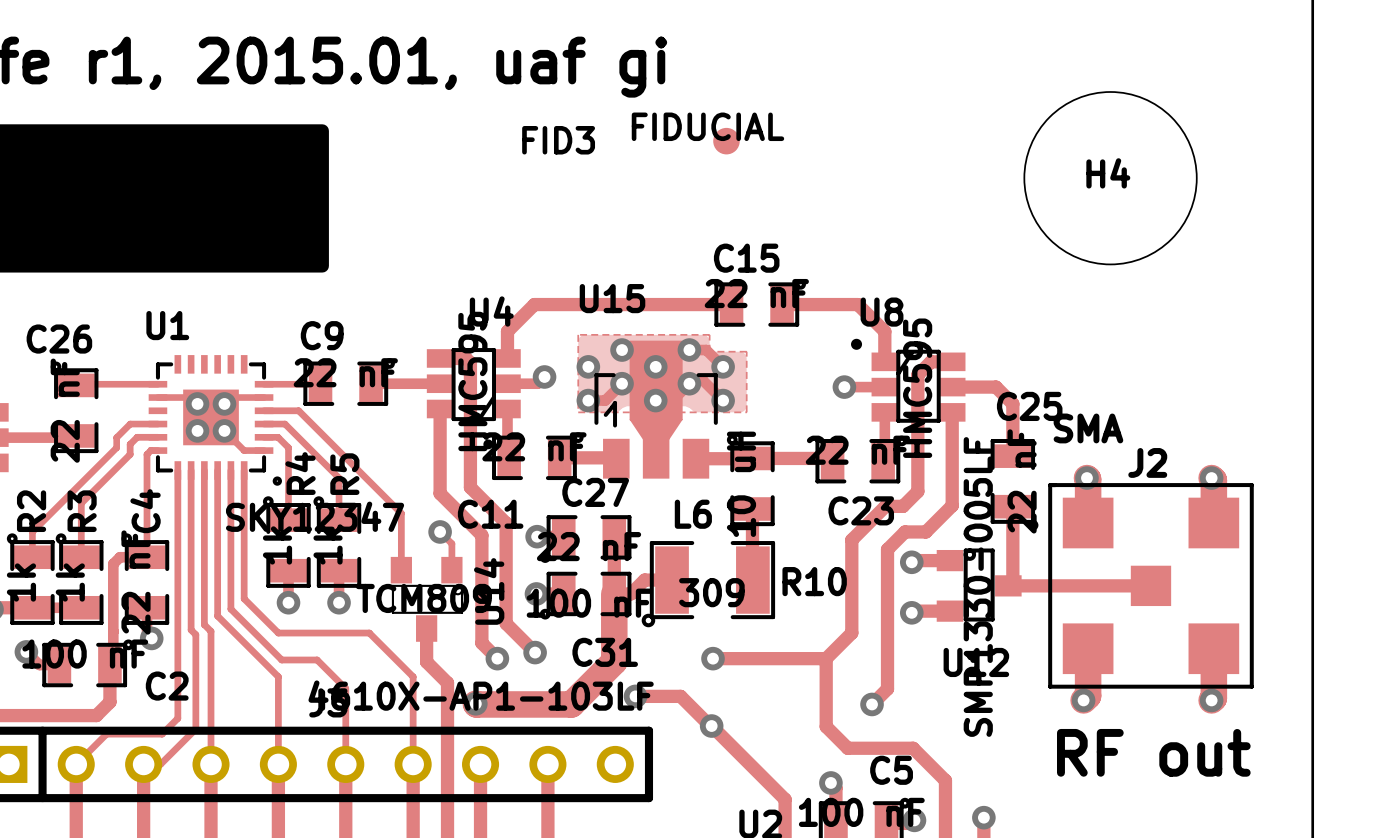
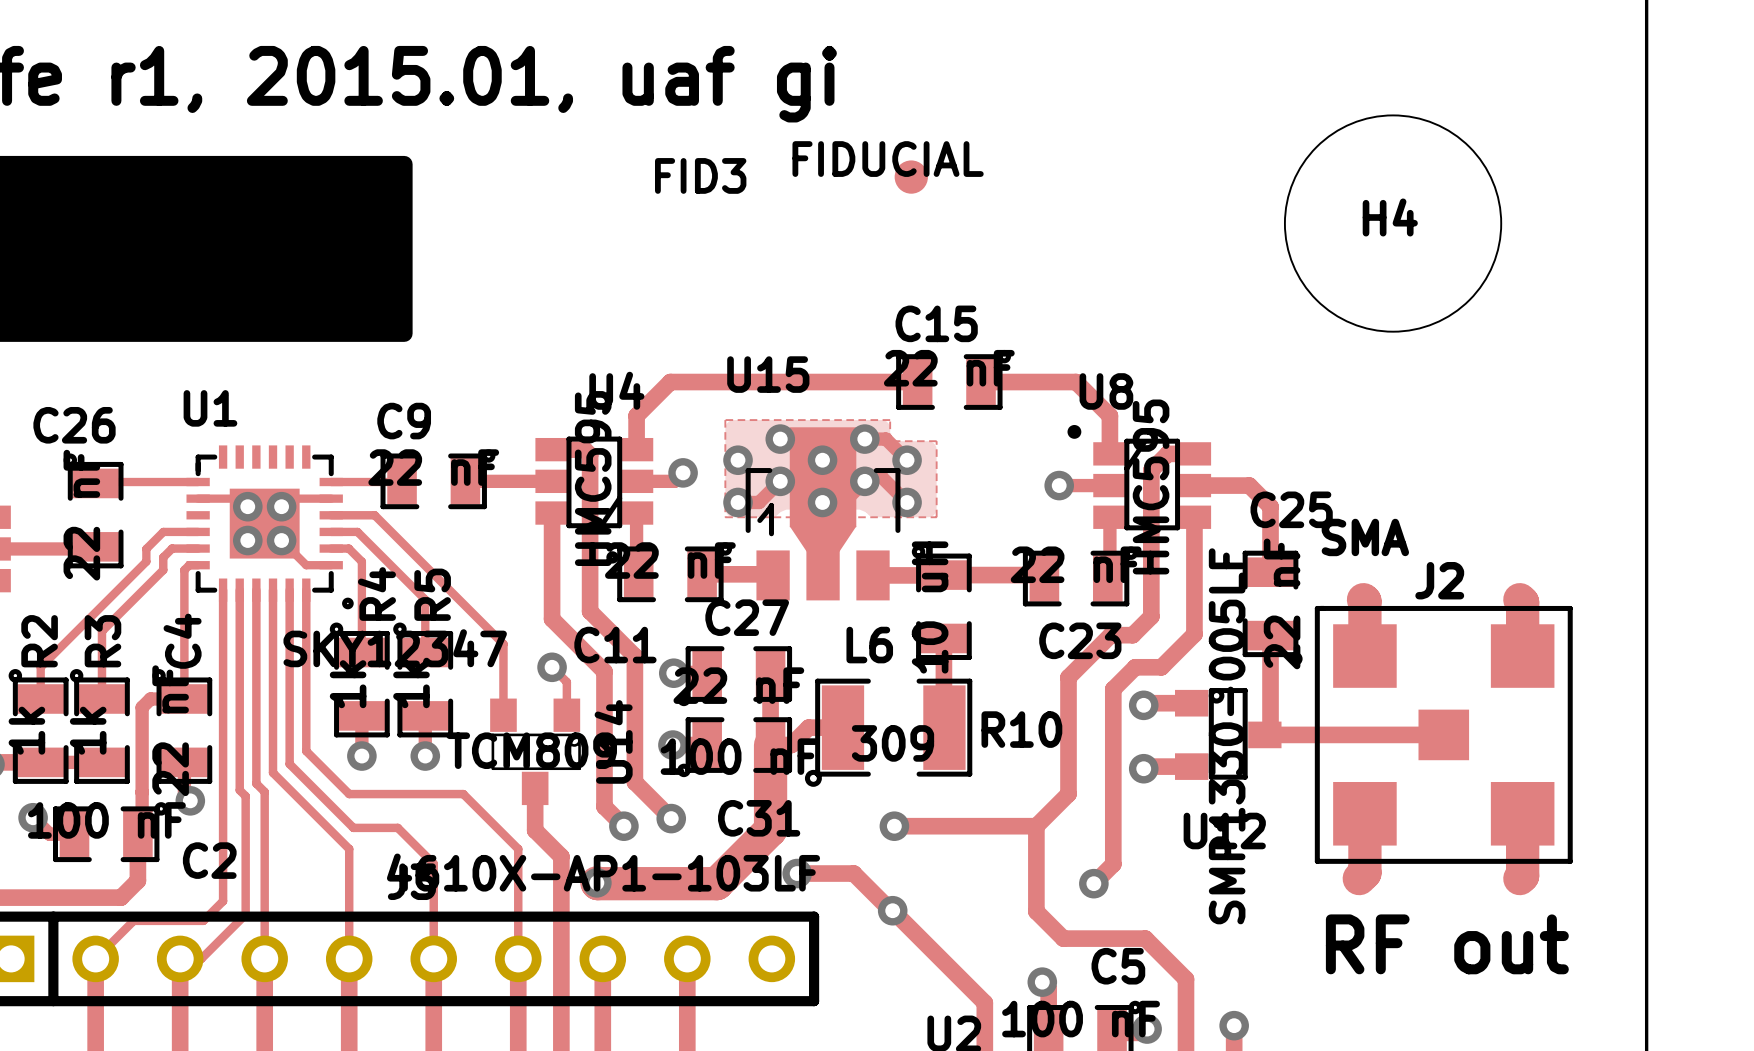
via: (1086, 478) -> none
via: (1211, 478) -> none
via: (1083, 700) -> none
via: (1211, 700) -> none

